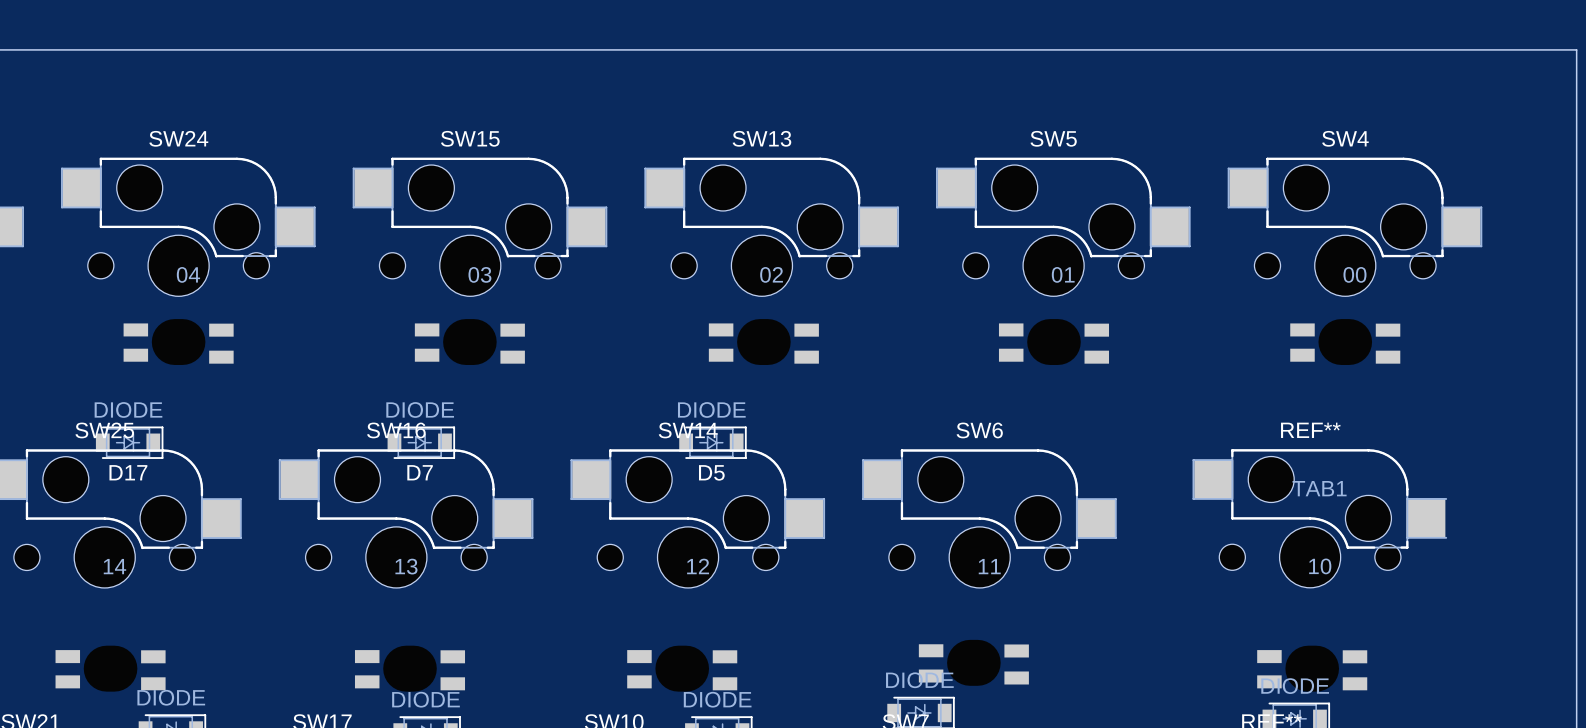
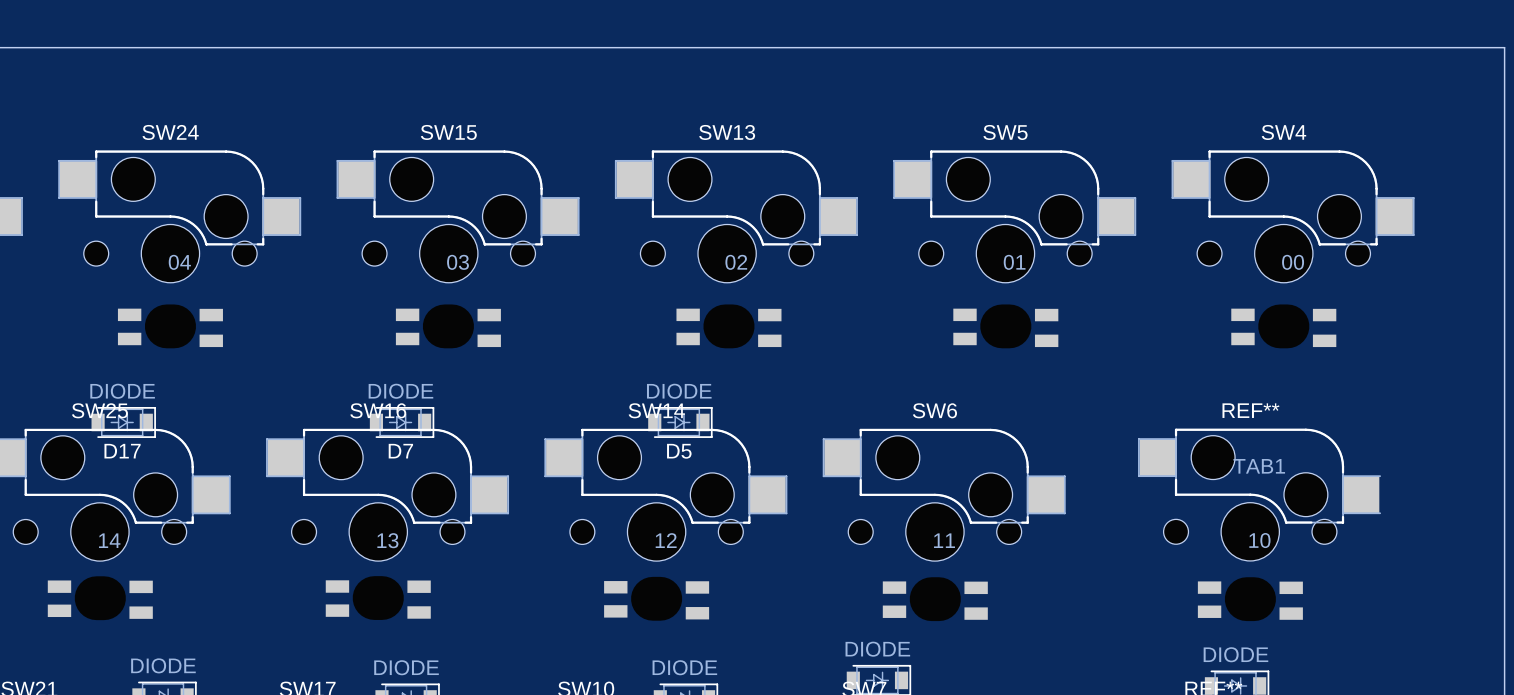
part position: (973, 662) -> (935, 599)
part position: (110, 668) -> (100, 598)
part position: (410, 668) -> (378, 598)
part position: (682, 668) -> (656, 598)
part position: (1312, 668) -> (1250, 599)

